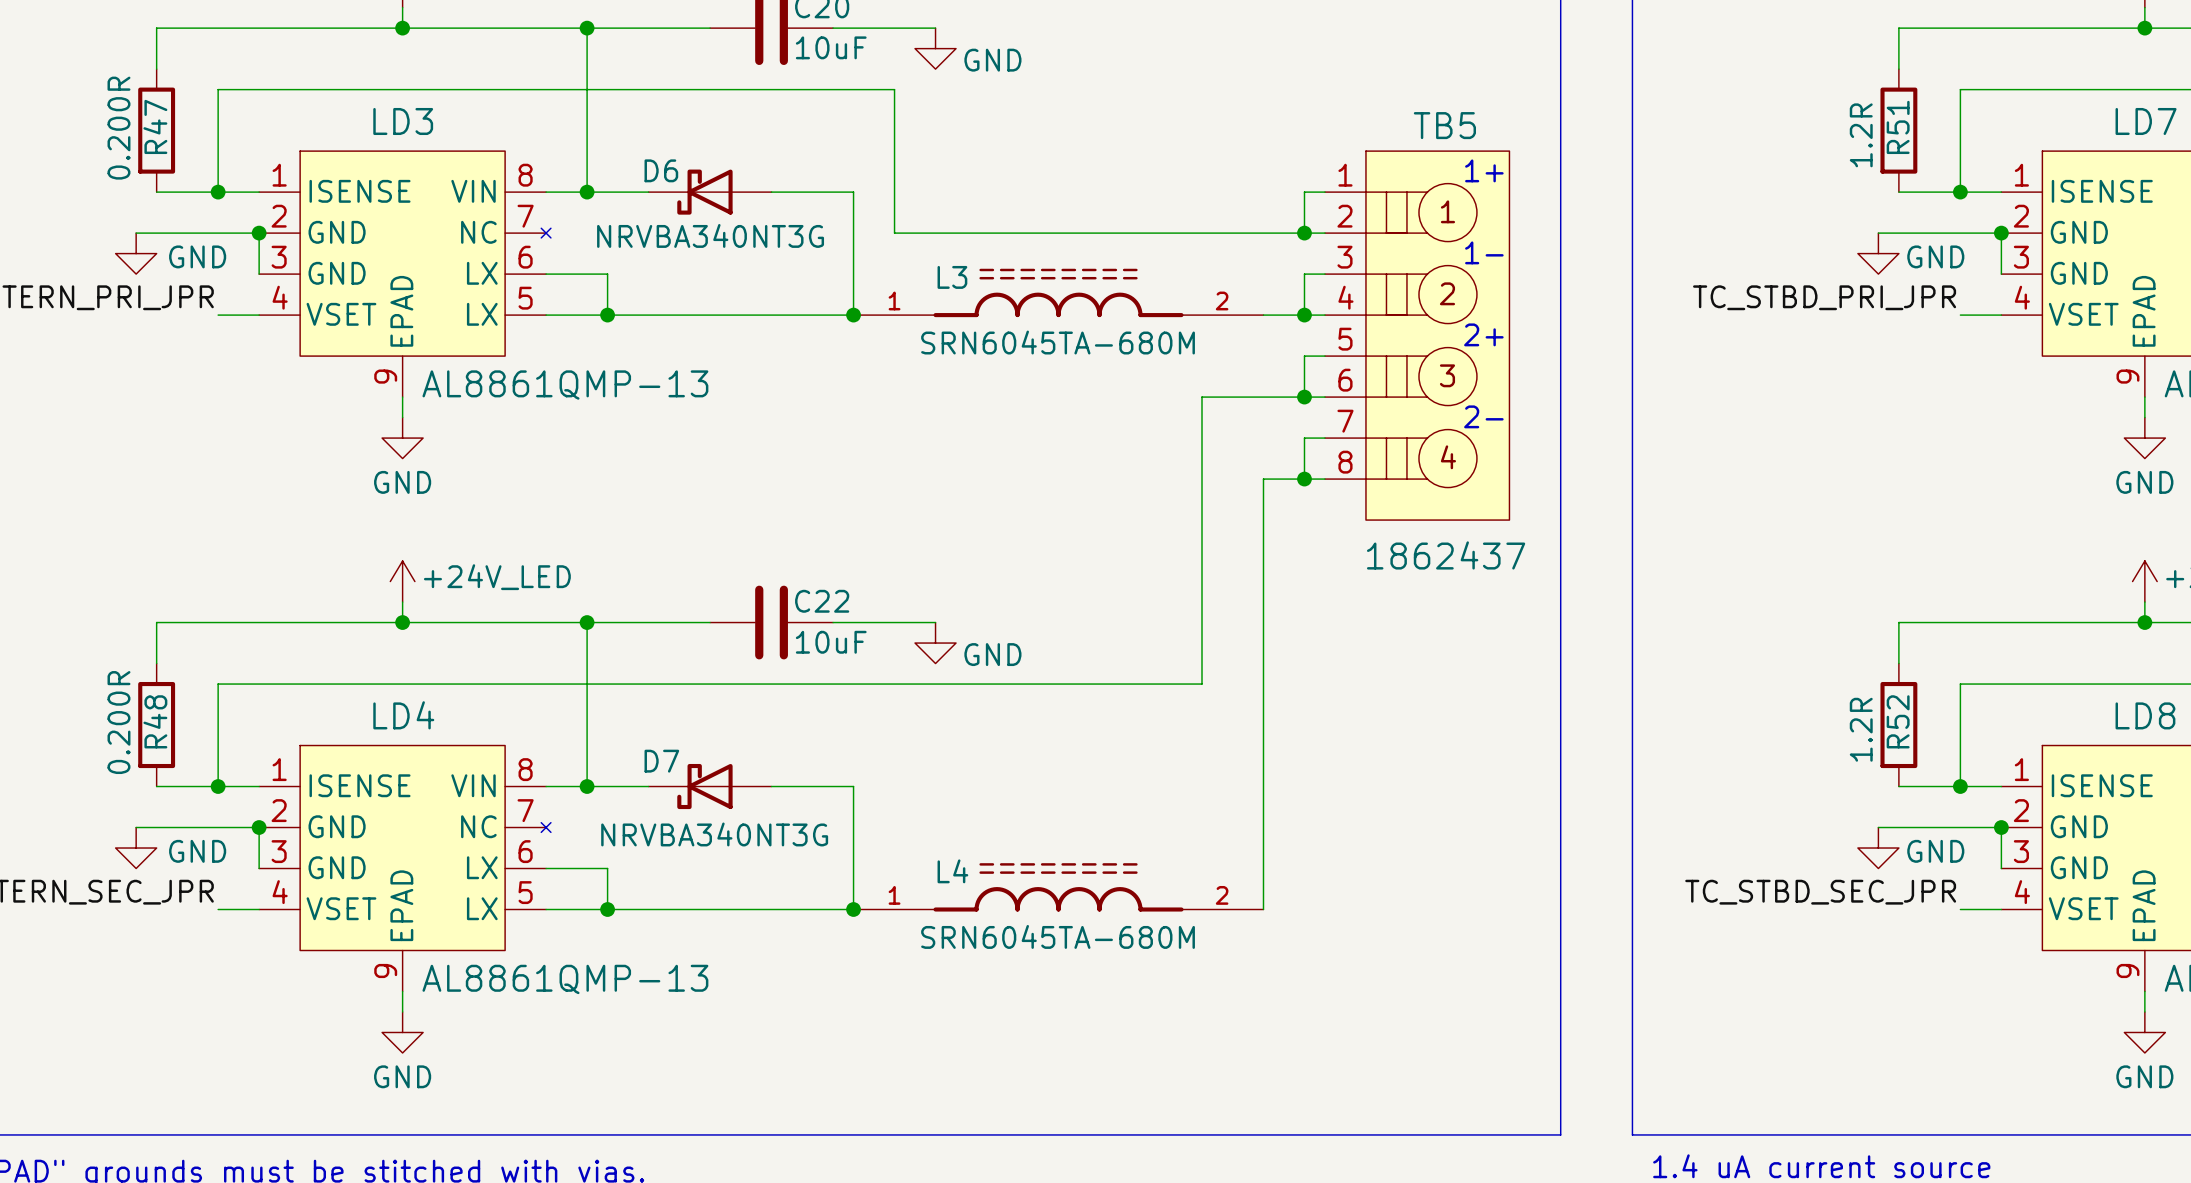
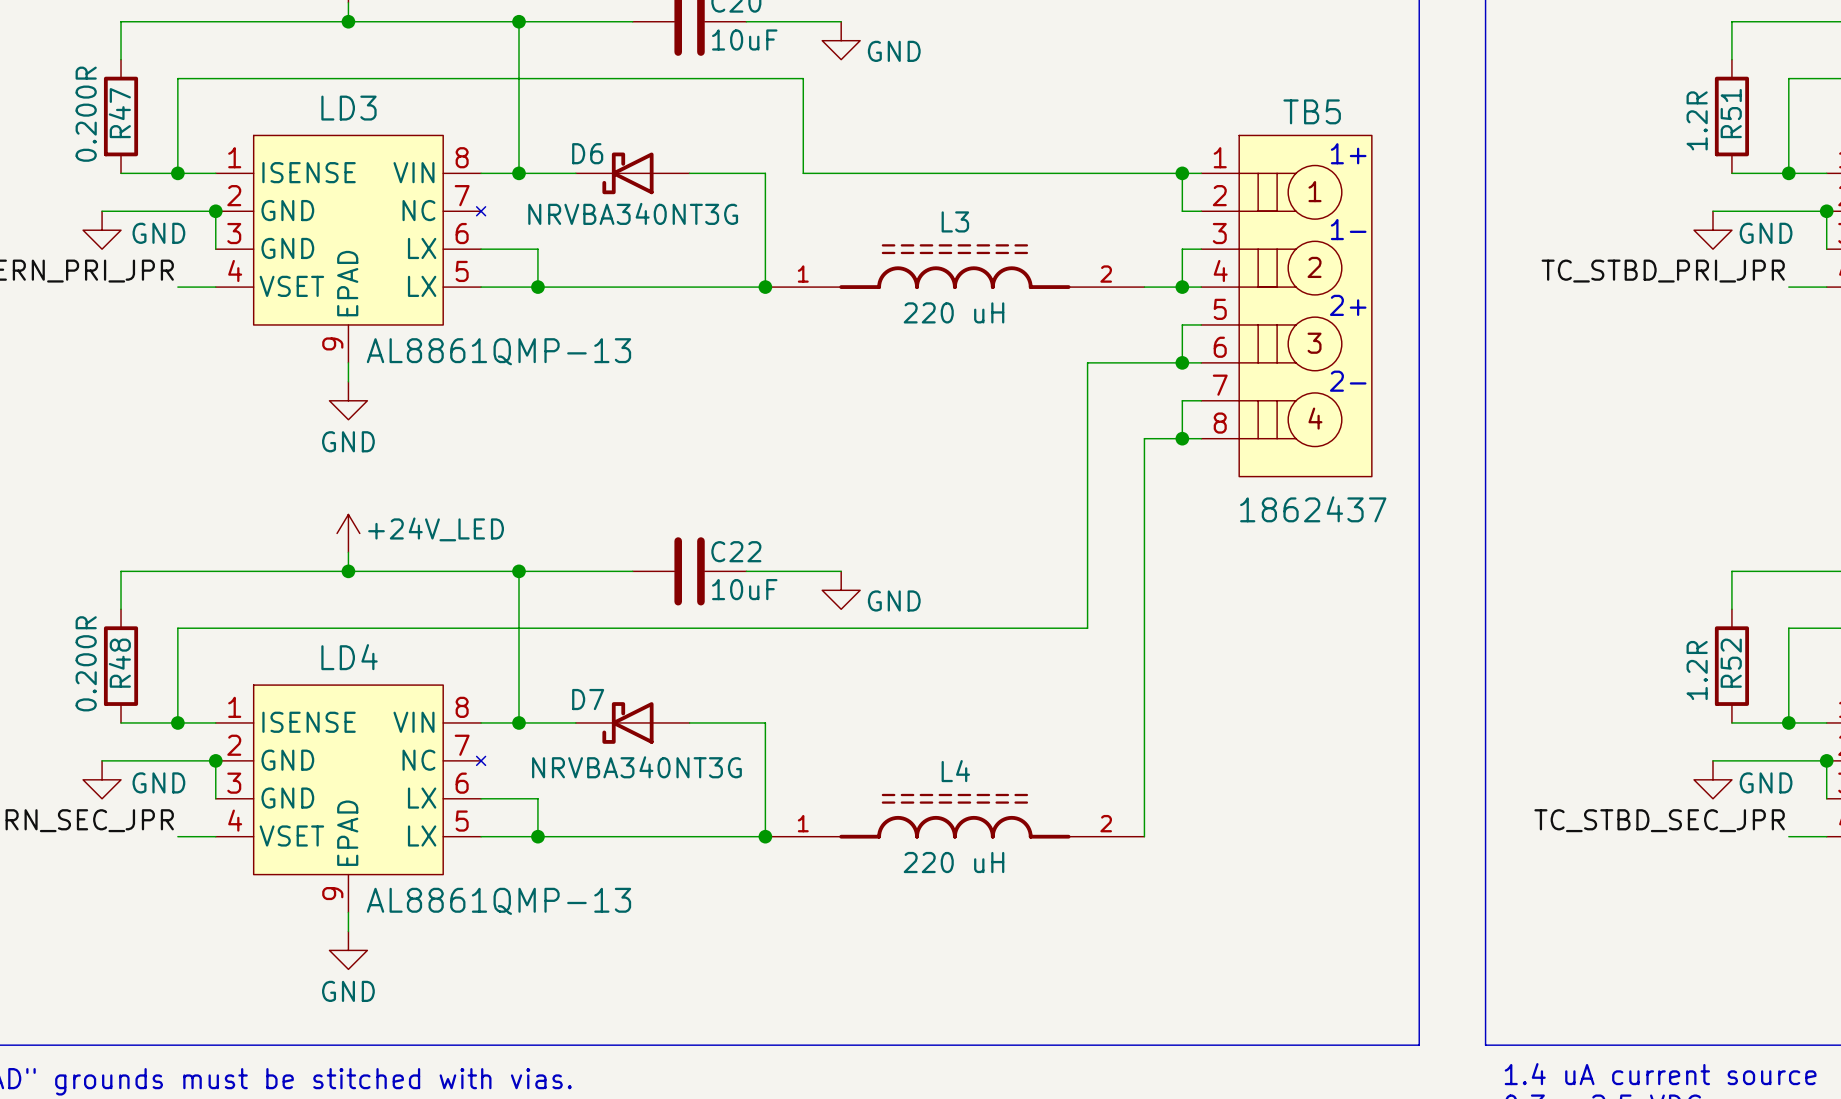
wire: (894, 192) (894, 233) (1304, 233) -> (803, 173) (1182, 173)
junction position: (1304, 233) -> (1182, 173)
L3 name position: L3 (952, 277) -> L3 (955, 221)
L3 value: SRN6045TA-680M (1058, 342) -> 220 uH (954, 312)
L4 name position: L4 (952, 871) -> L4 (955, 771)
L4 value: SRN6045TA-680M (1058, 936) -> 220 uH (954, 862)

